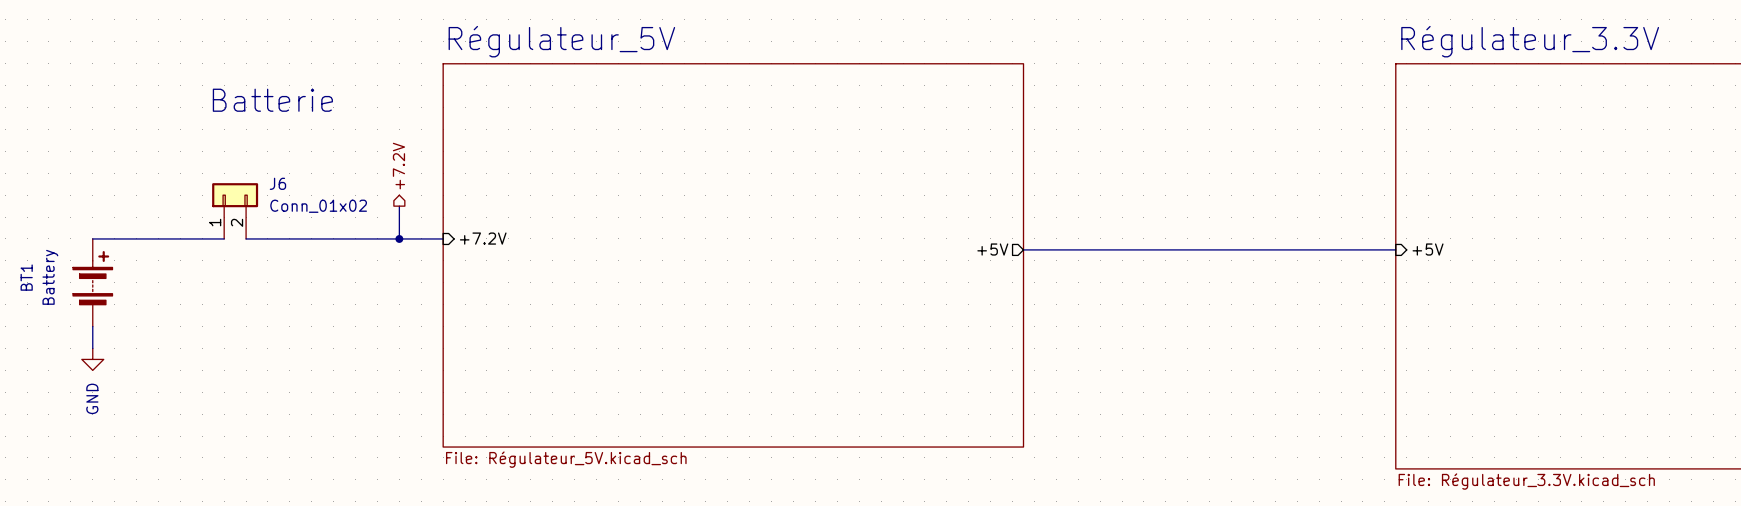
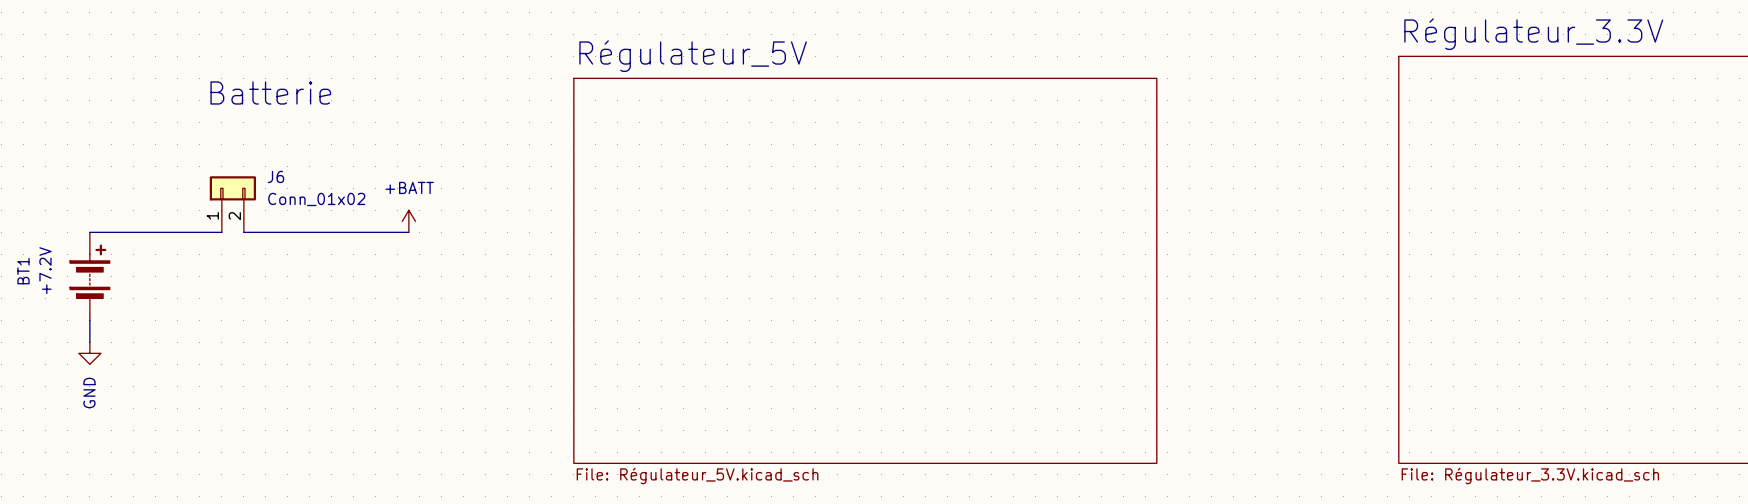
hierarchical label: +7.2V (398, 166) -> none
wire: (399, 206) (399, 238) -> none
power symbol: none -> +BATT (408, 221)
junction: (399, 238) -> none
wire: (410, 238) (443, 238) -> none
sheet pin: +7.2V (483, 238) -> none
sheet pin: +5V (992, 249) -> none
wire: (1023, 249) (1395, 249) -> none
sheet pin: +5V (1428, 249) -> none
sheet Régulateur_5V position: (733, 255) -> (865, 270)
BT1 value: Battery (50, 277) -> +7.2V (45, 270)

